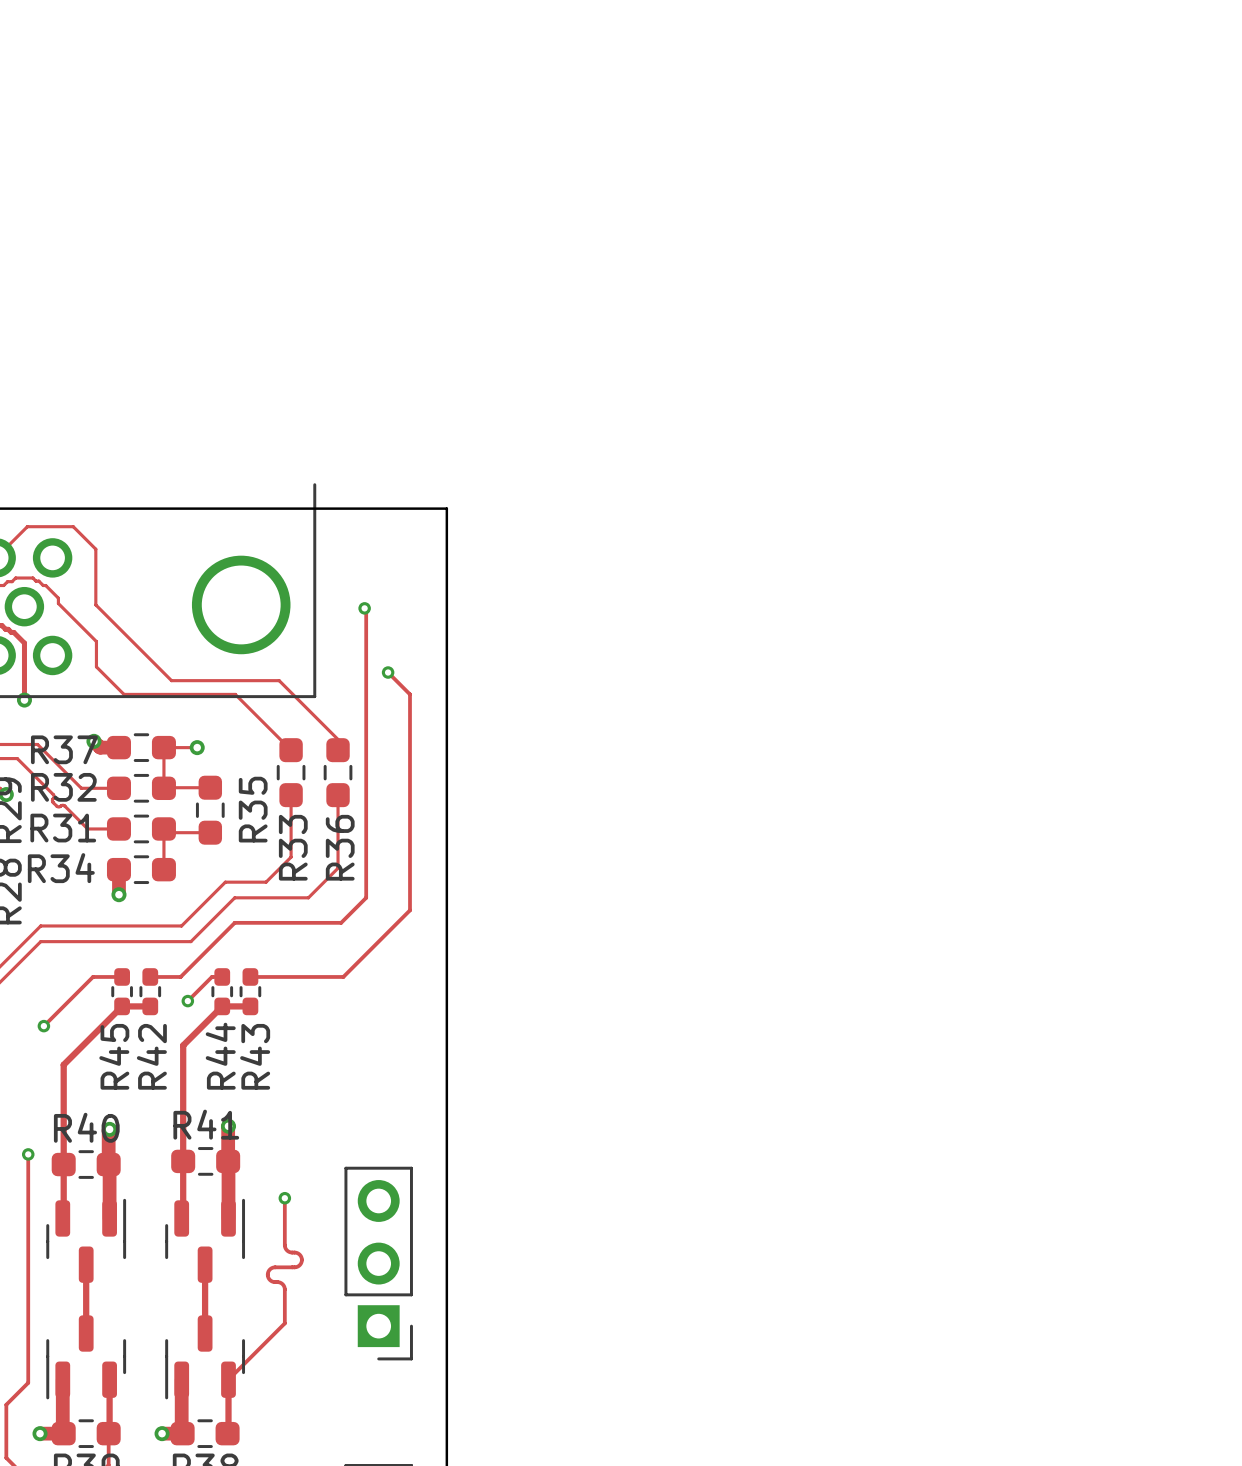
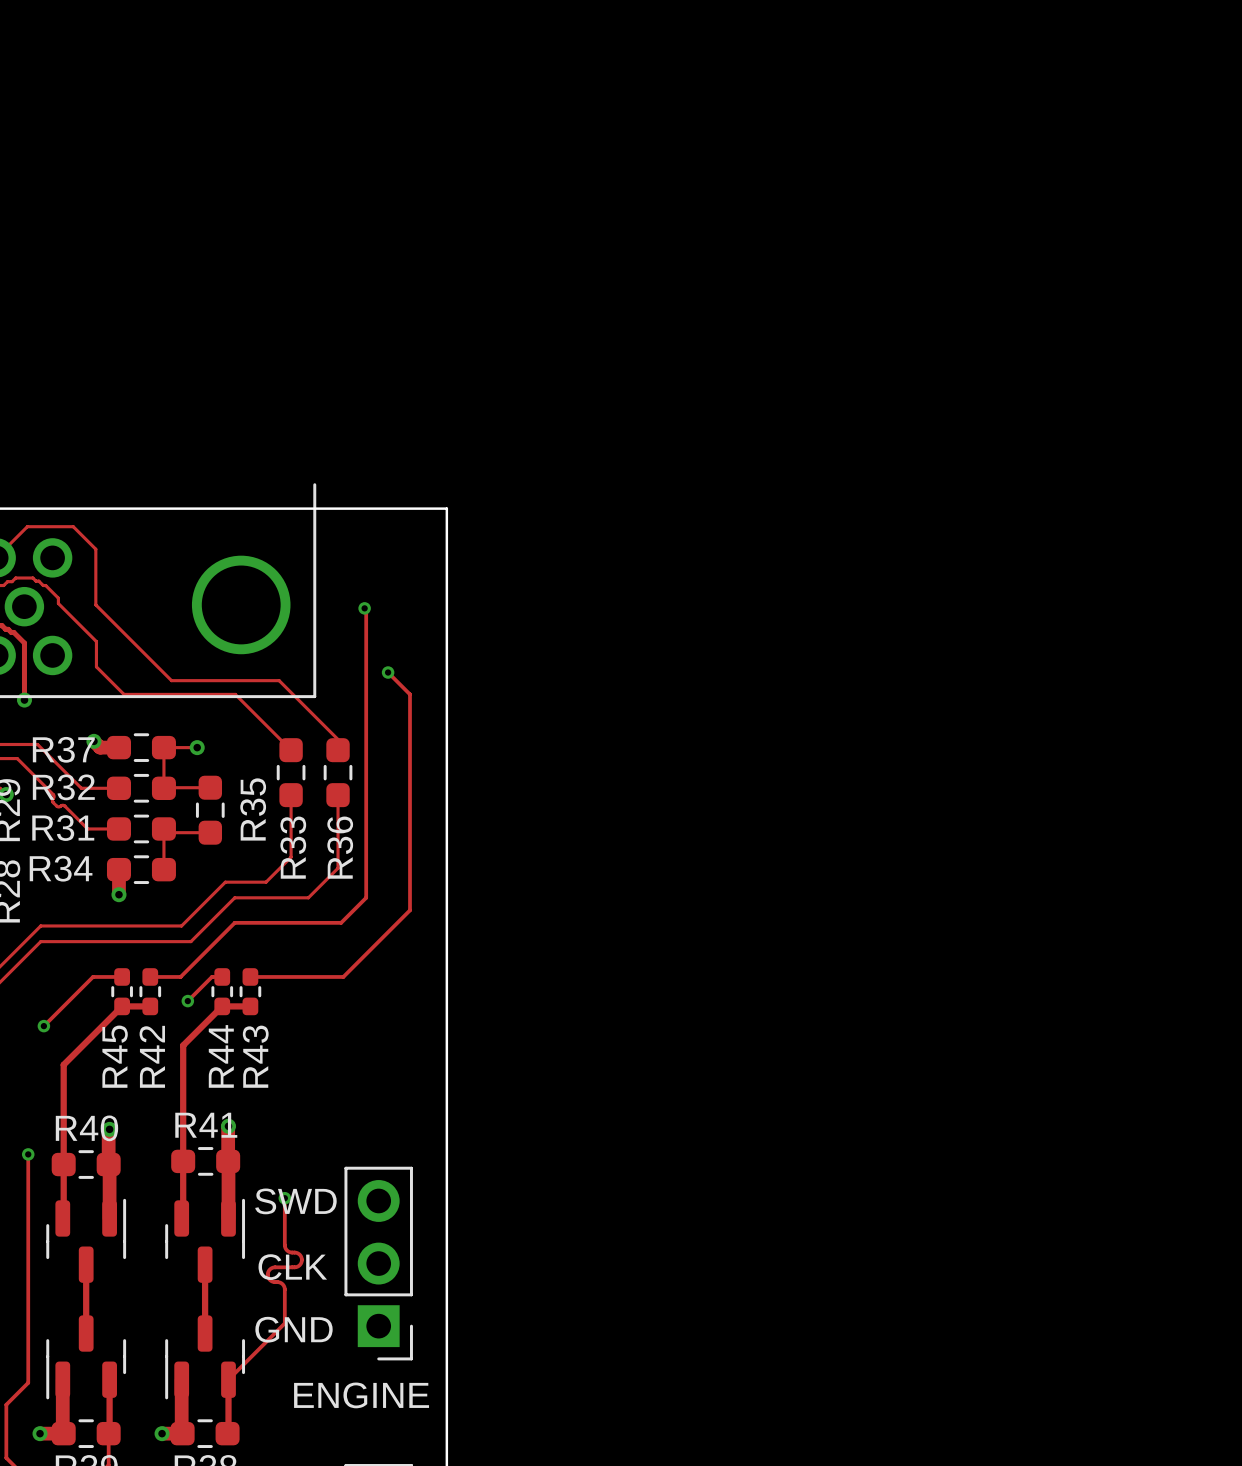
text: none -> SWD (295, 1201)
text: none -> CLK (292, 1267)
text: none -> GND (294, 1329)
text: none -> ENGINE (361, 1395)

